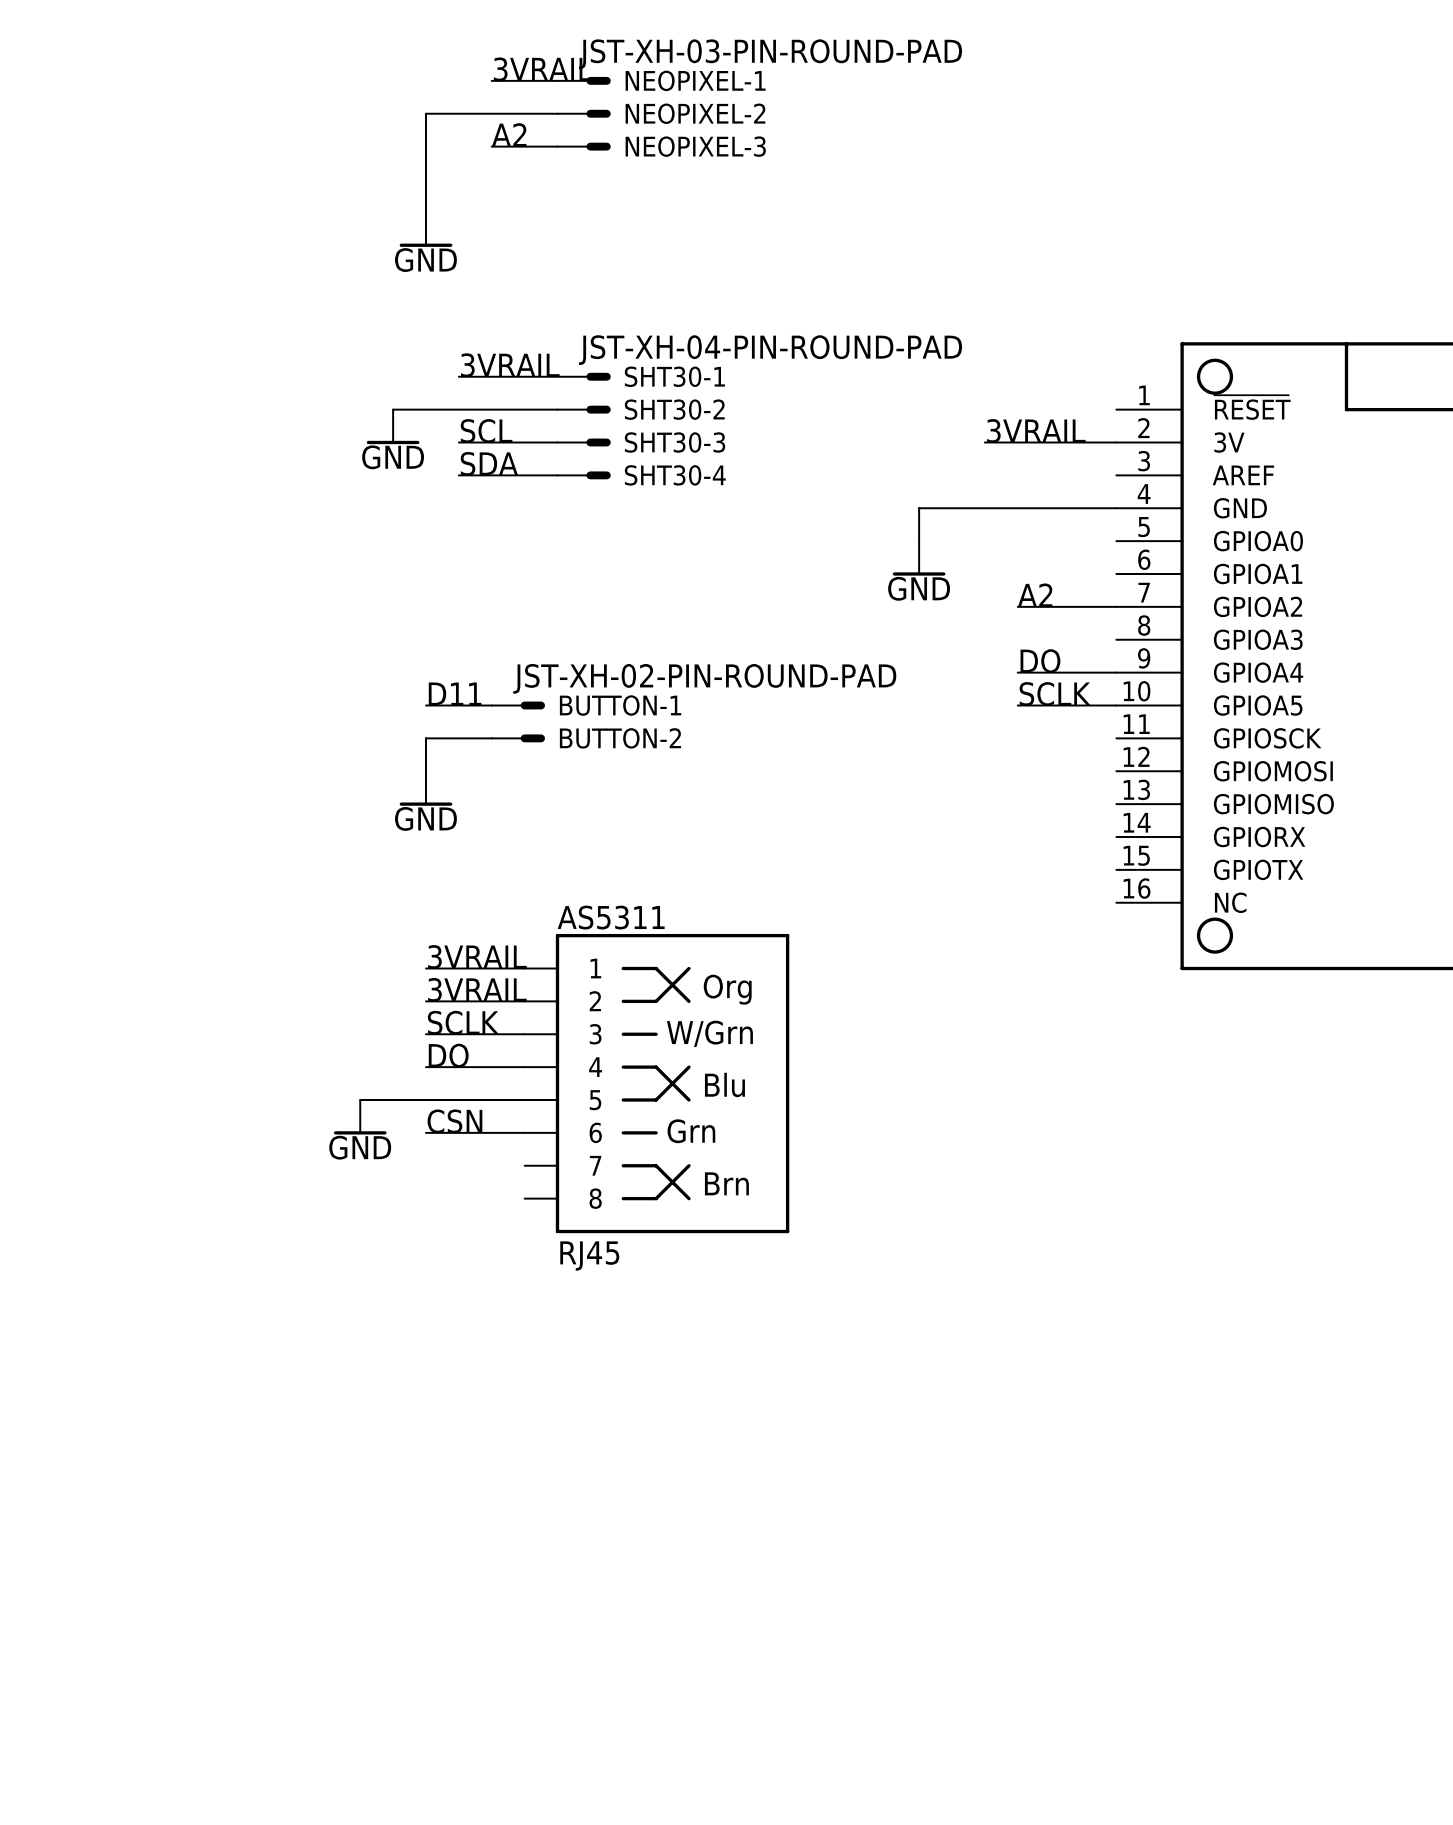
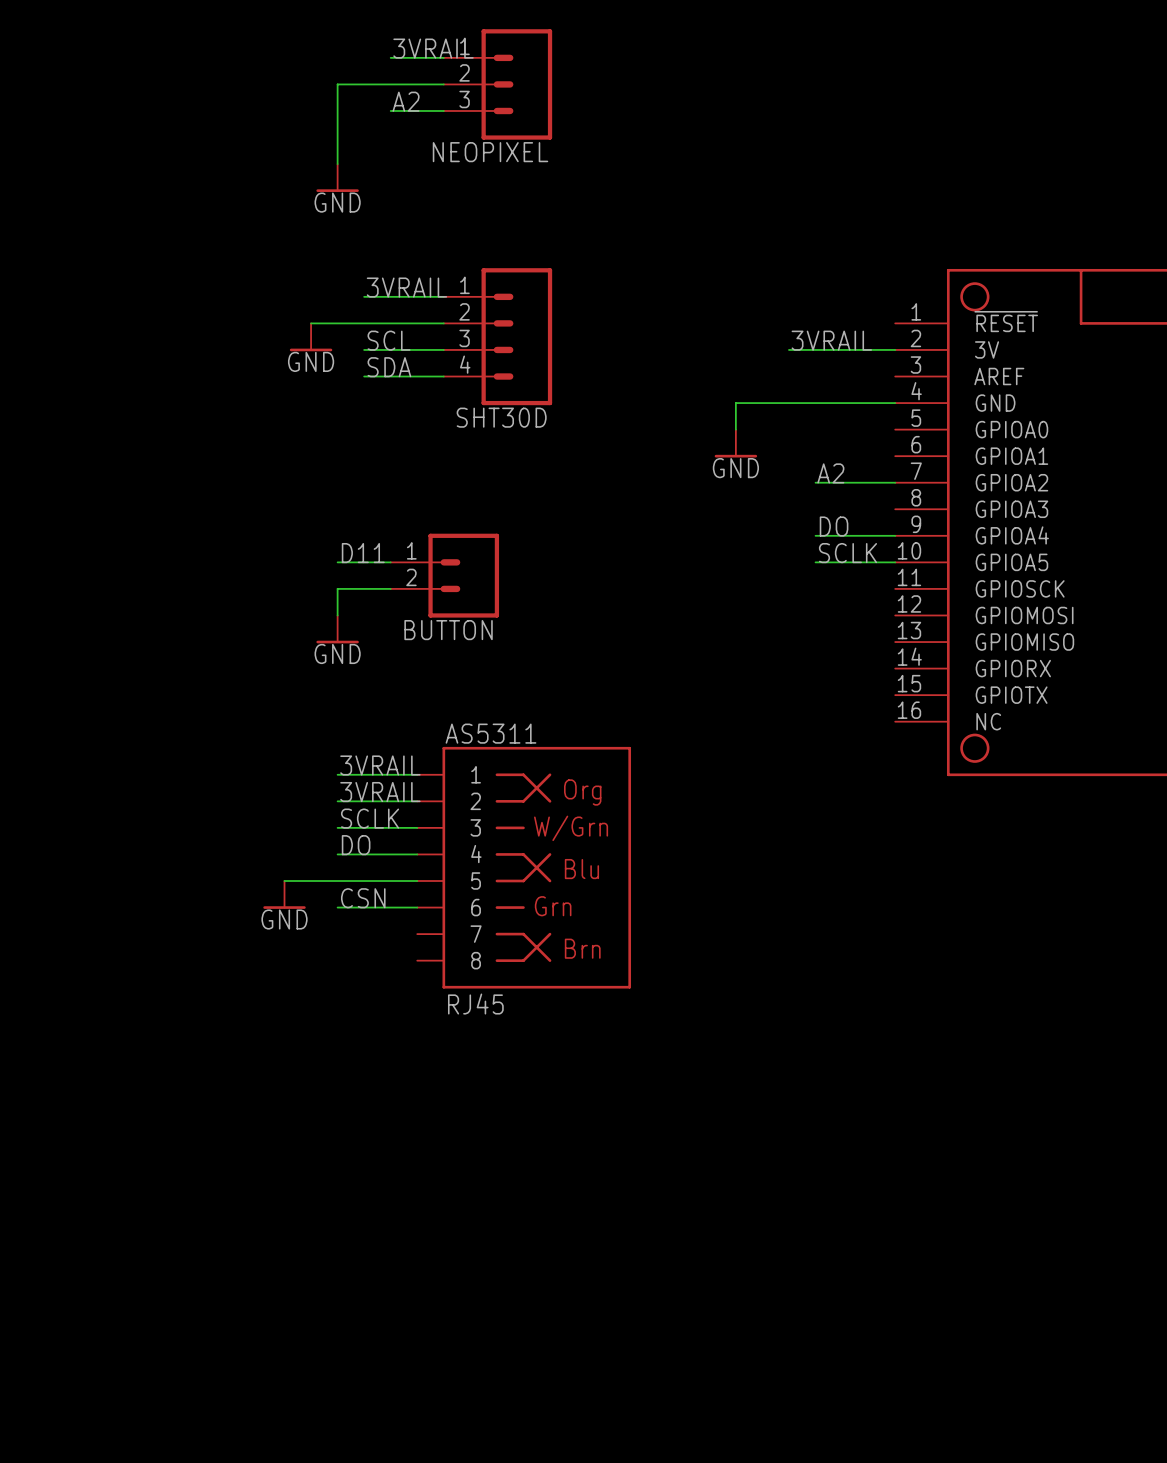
NEOPIXEL-1: JST-XH-03-PIN-ROUND-PAD (584, 80) -> none
NEOPIXEL-2: (584, 113) -> none
NEOPIXEL: none -> (497, 84)
NEOPIXEL-3: (584, 146) -> none
SHT30-1: JST-XH-04-PIN-ROUND-PAD (584, 376) -> none
SHT30-2: (584, 409) -> none
SHT30D: none -> (497, 336)
SHT30-3: (584, 442) -> none
SHT30-4: (584, 475) -> none
BUTTON-1: JST-XH-02-PIN-ROUND-PAD (518, 705) -> none
BUTTON: none -> (444, 575)
BUTTON-2: (518, 738) -> none

